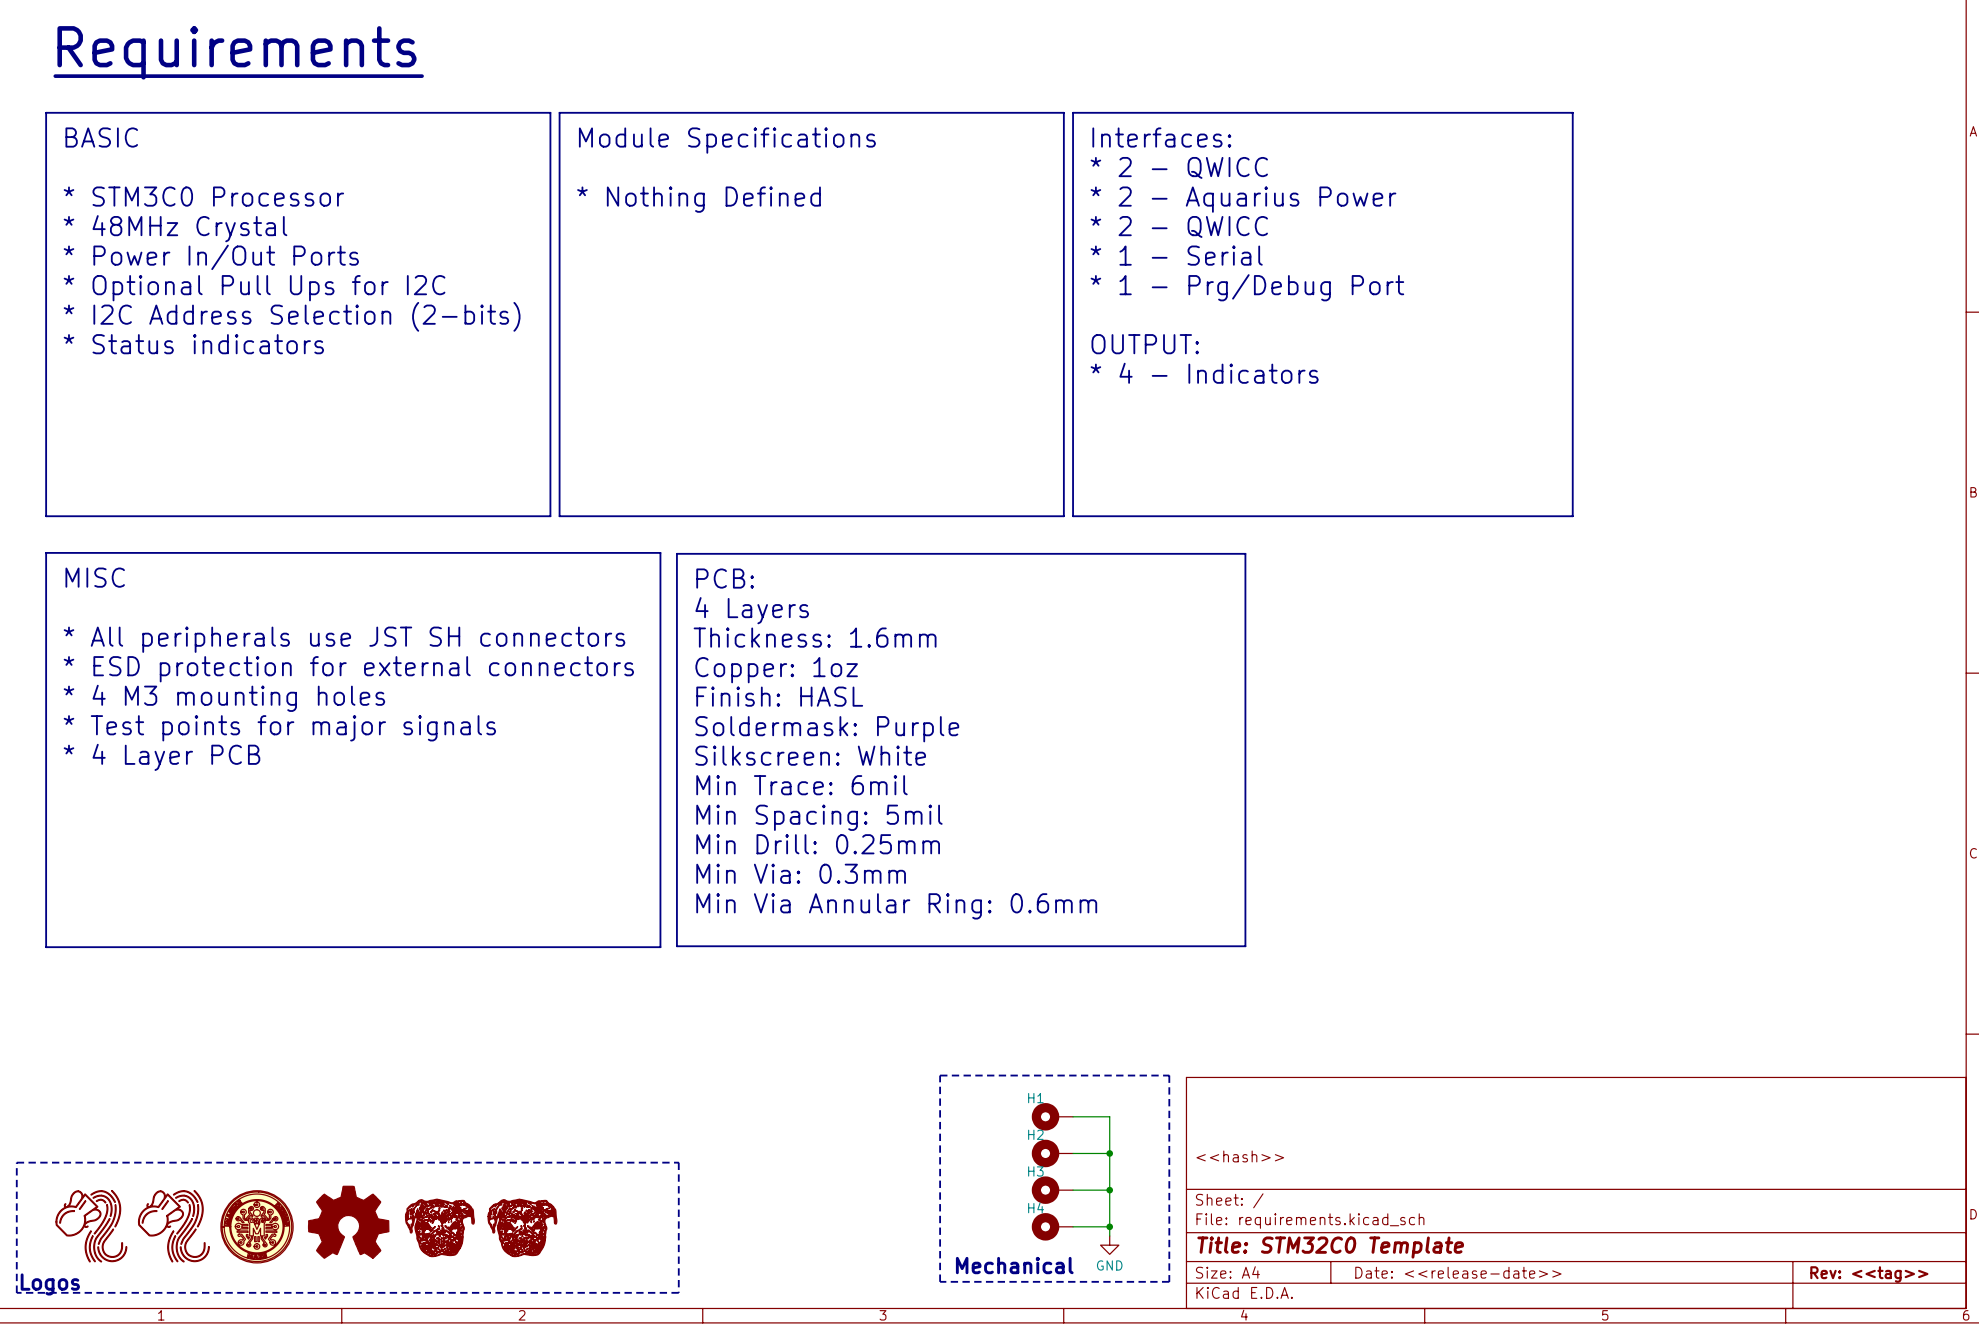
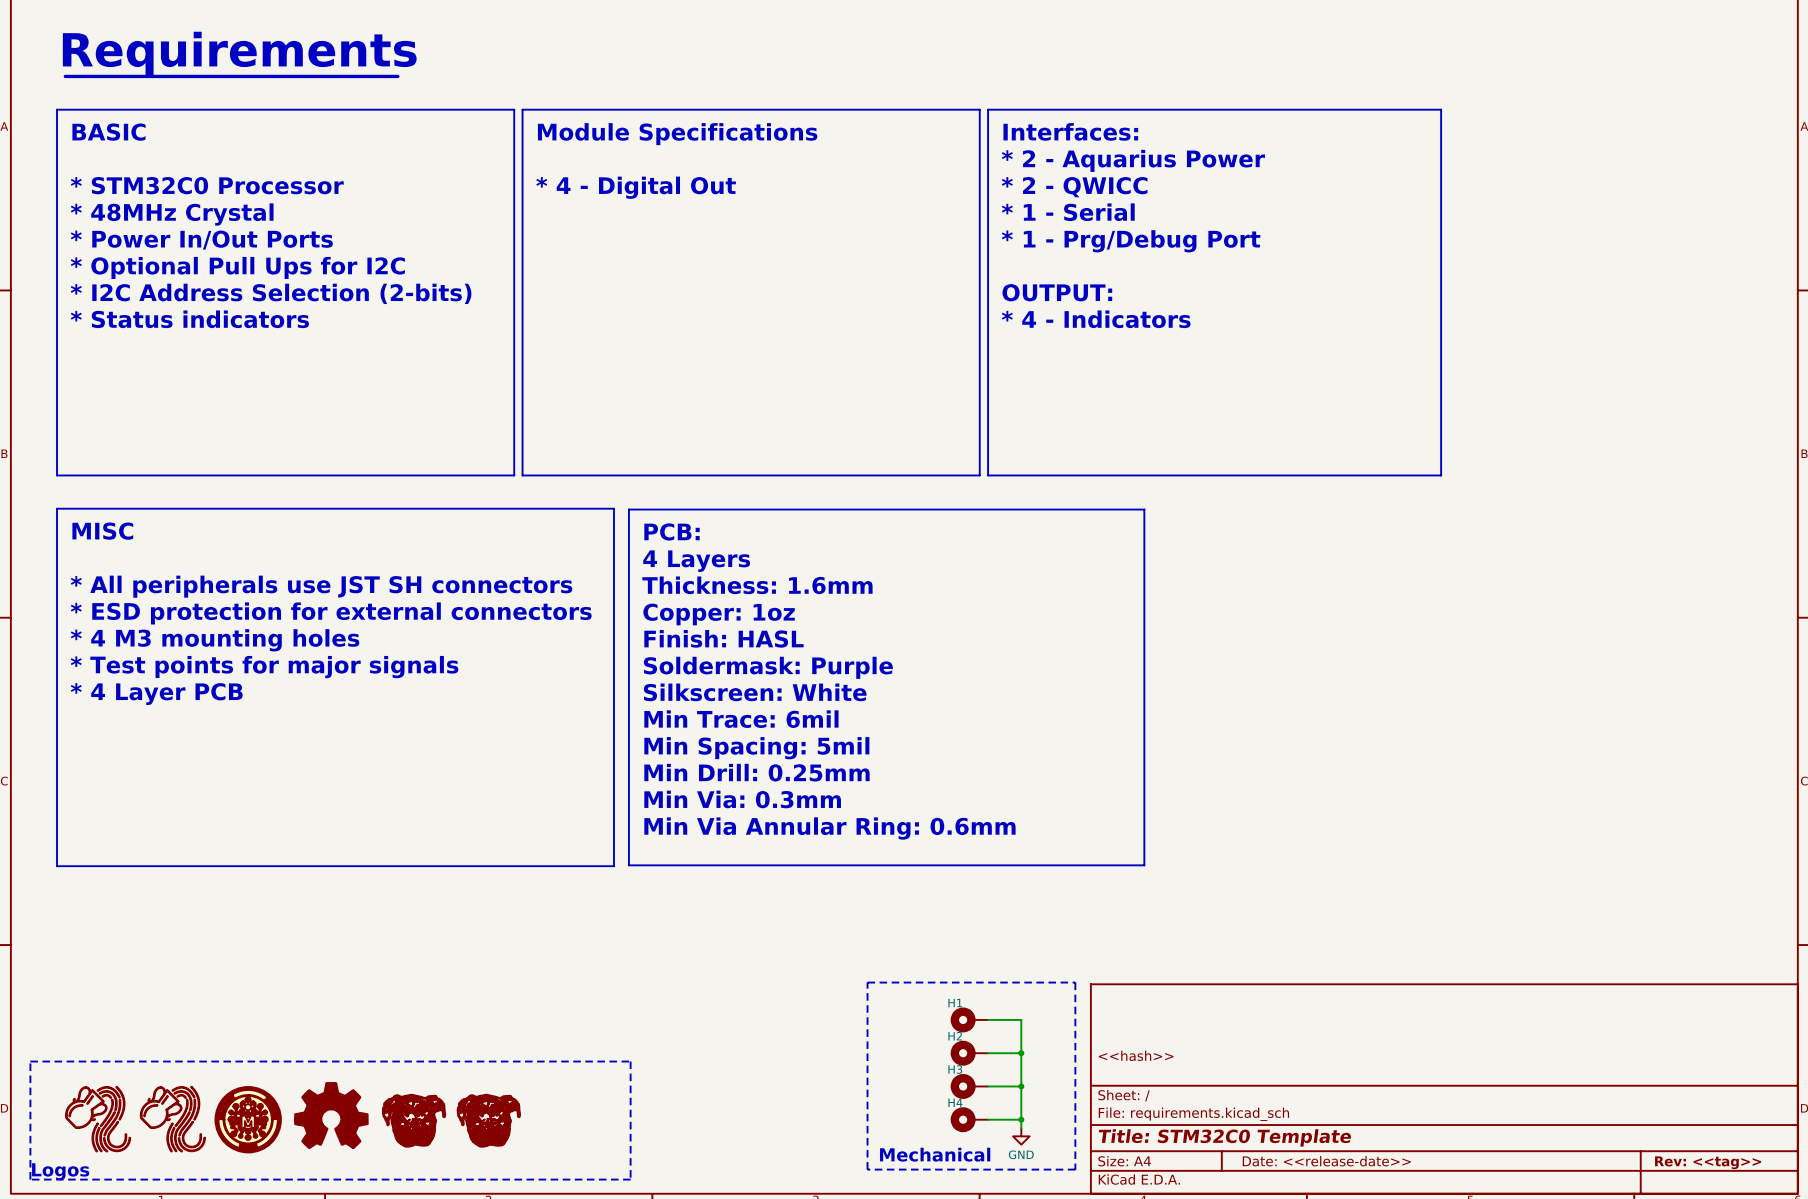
text: * 2 - QWICC (1179, 167) -> * 2 - Aquarius Power (1133, 160)
text: * STM3C0 Processor (203, 196) -> * STM32C0 Processor (207, 185)
text: * Nothing Defined (699, 199) -> * 4 - Digital Out (636, 187)
text: * 2 - Aquarius Power (1243, 199) -> * 2 - QWICC (1074, 187)
text: * 2 - QWICC (1179, 226) -> * 1 - Serial (1068, 212)
text: * 1 - Serial (1176, 255) -> * 1 - Prg/Debug Port (1131, 241)
text: * 1 - Prg/Debug Port (1247, 287) -> none
text: none -> OUTPUT: (1057, 292)
text: OUTPUT: (1145, 344) -> * 4 - Indicators (1096, 319)
text: * 4 - Indicators (1204, 373) -> none

